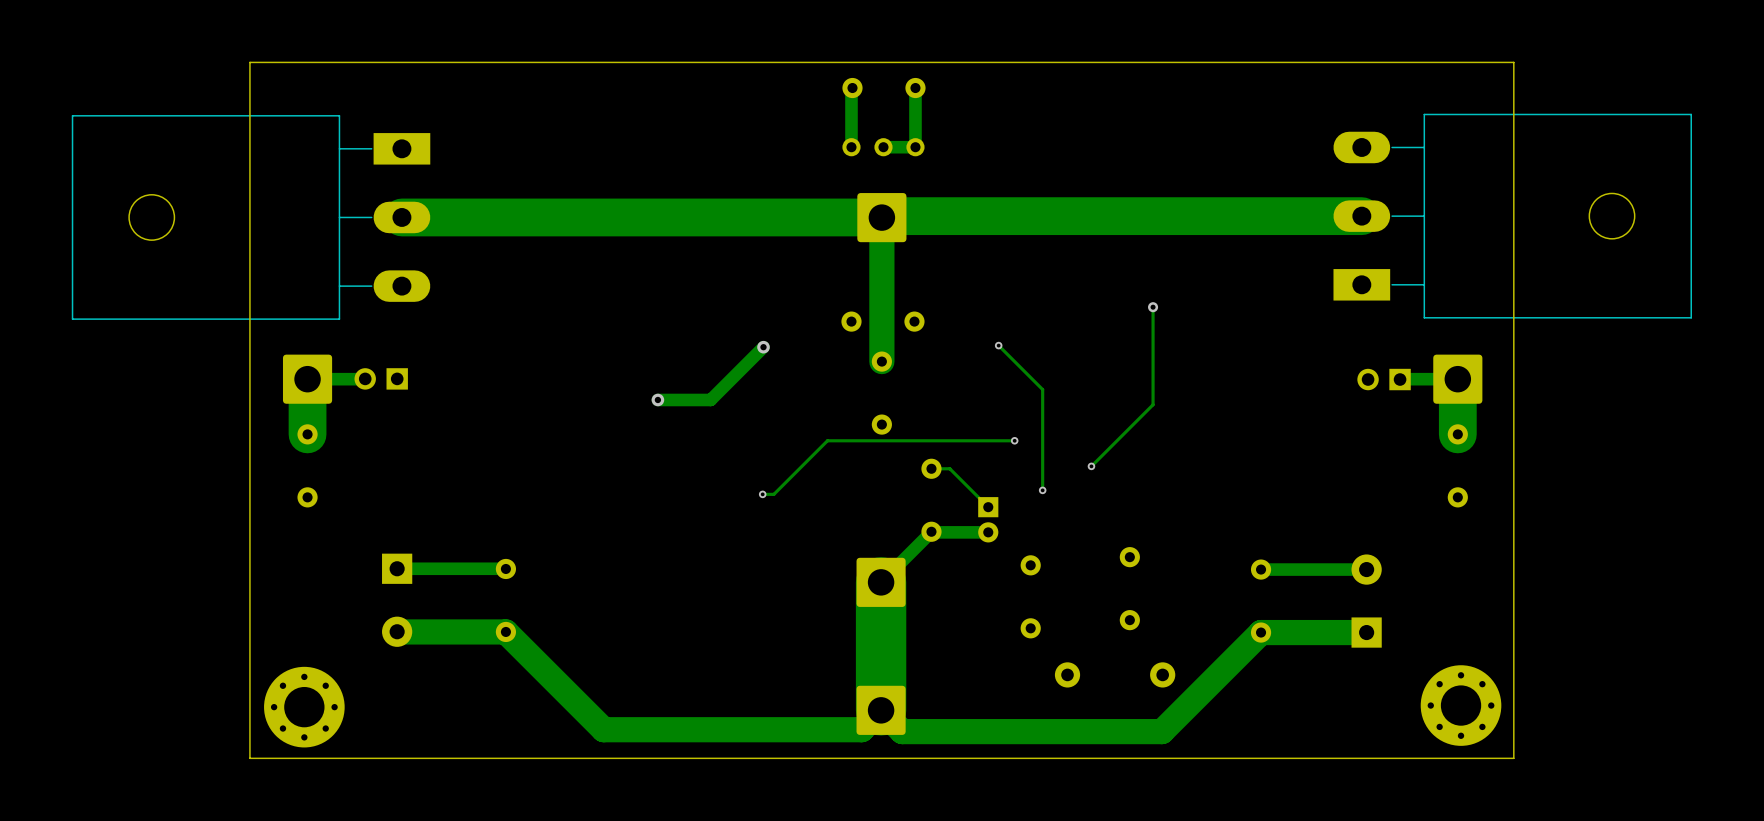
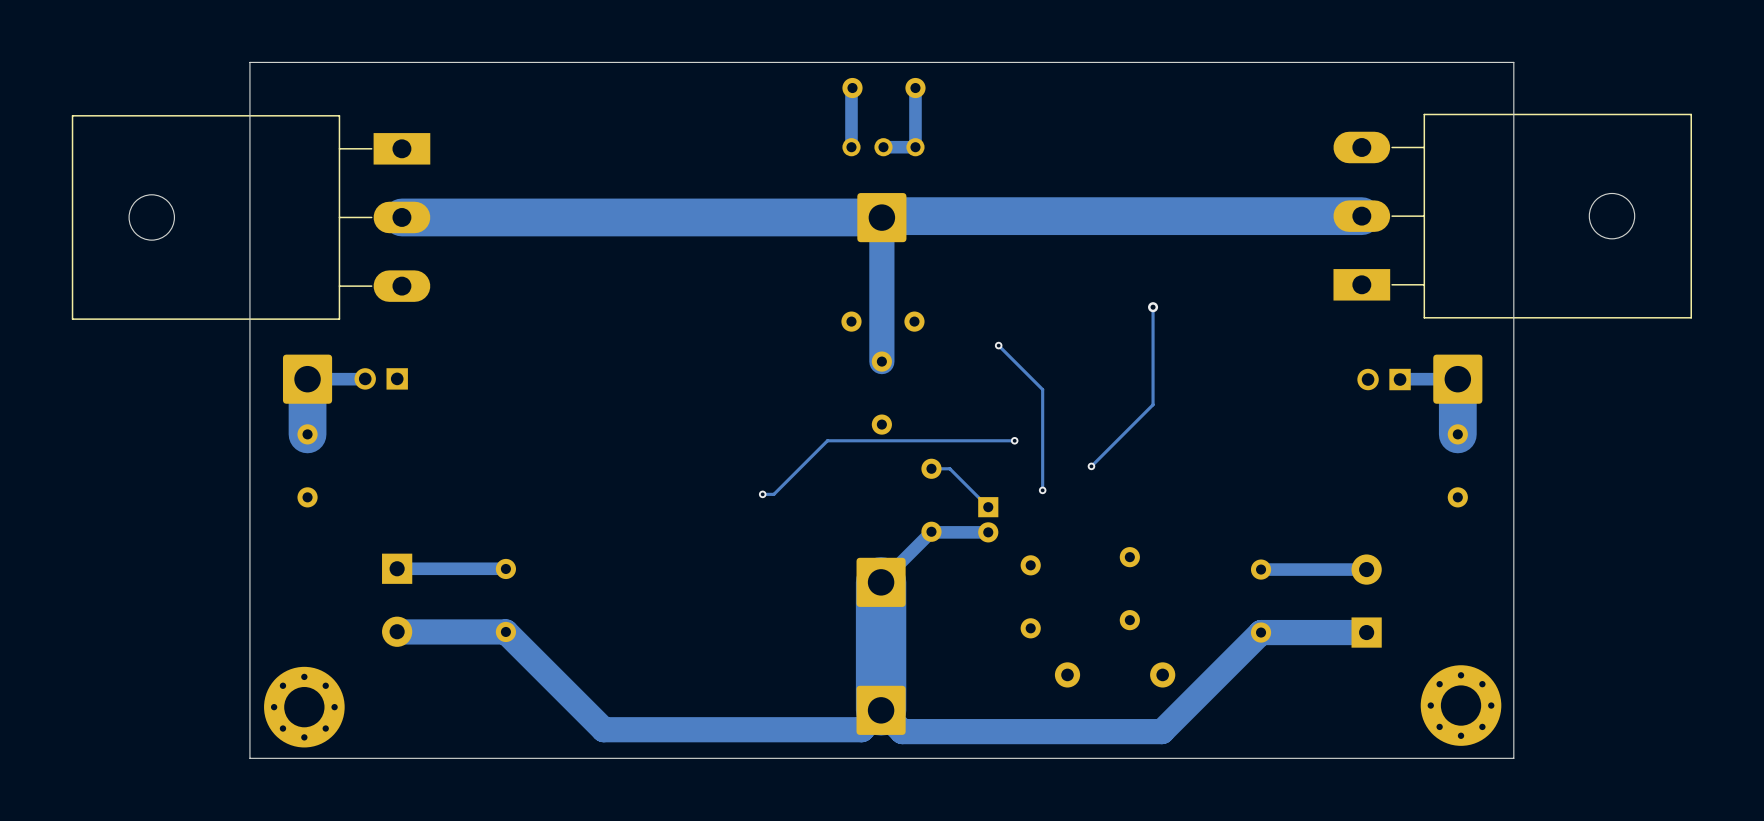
track: (763, 347) (710, 399) (657, 399) -> none
via: (763, 347) -> none
via: (657, 399) -> none

